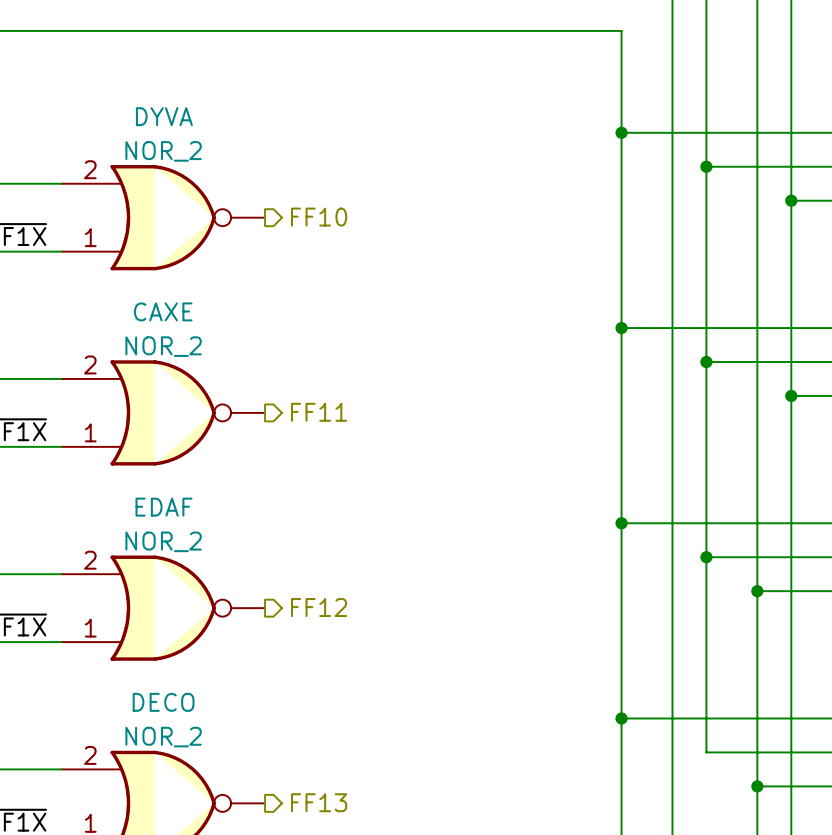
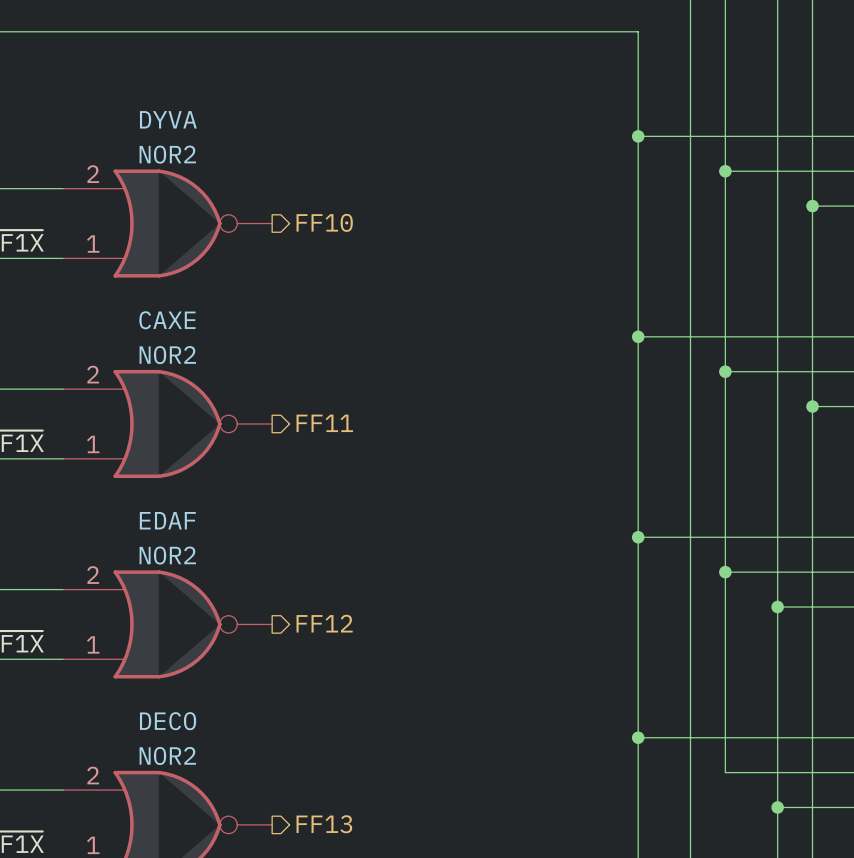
DYVA value: NOR_2 (163, 151) -> NOR2 (167, 154)
CAXE value: NOR_2 (163, 346) -> NOR2 (167, 355)
EDAF value: NOR_2 (163, 541) -> NOR2 (167, 555)
DECO value: NOR_2 (163, 737) -> NOR2 (167, 755)

